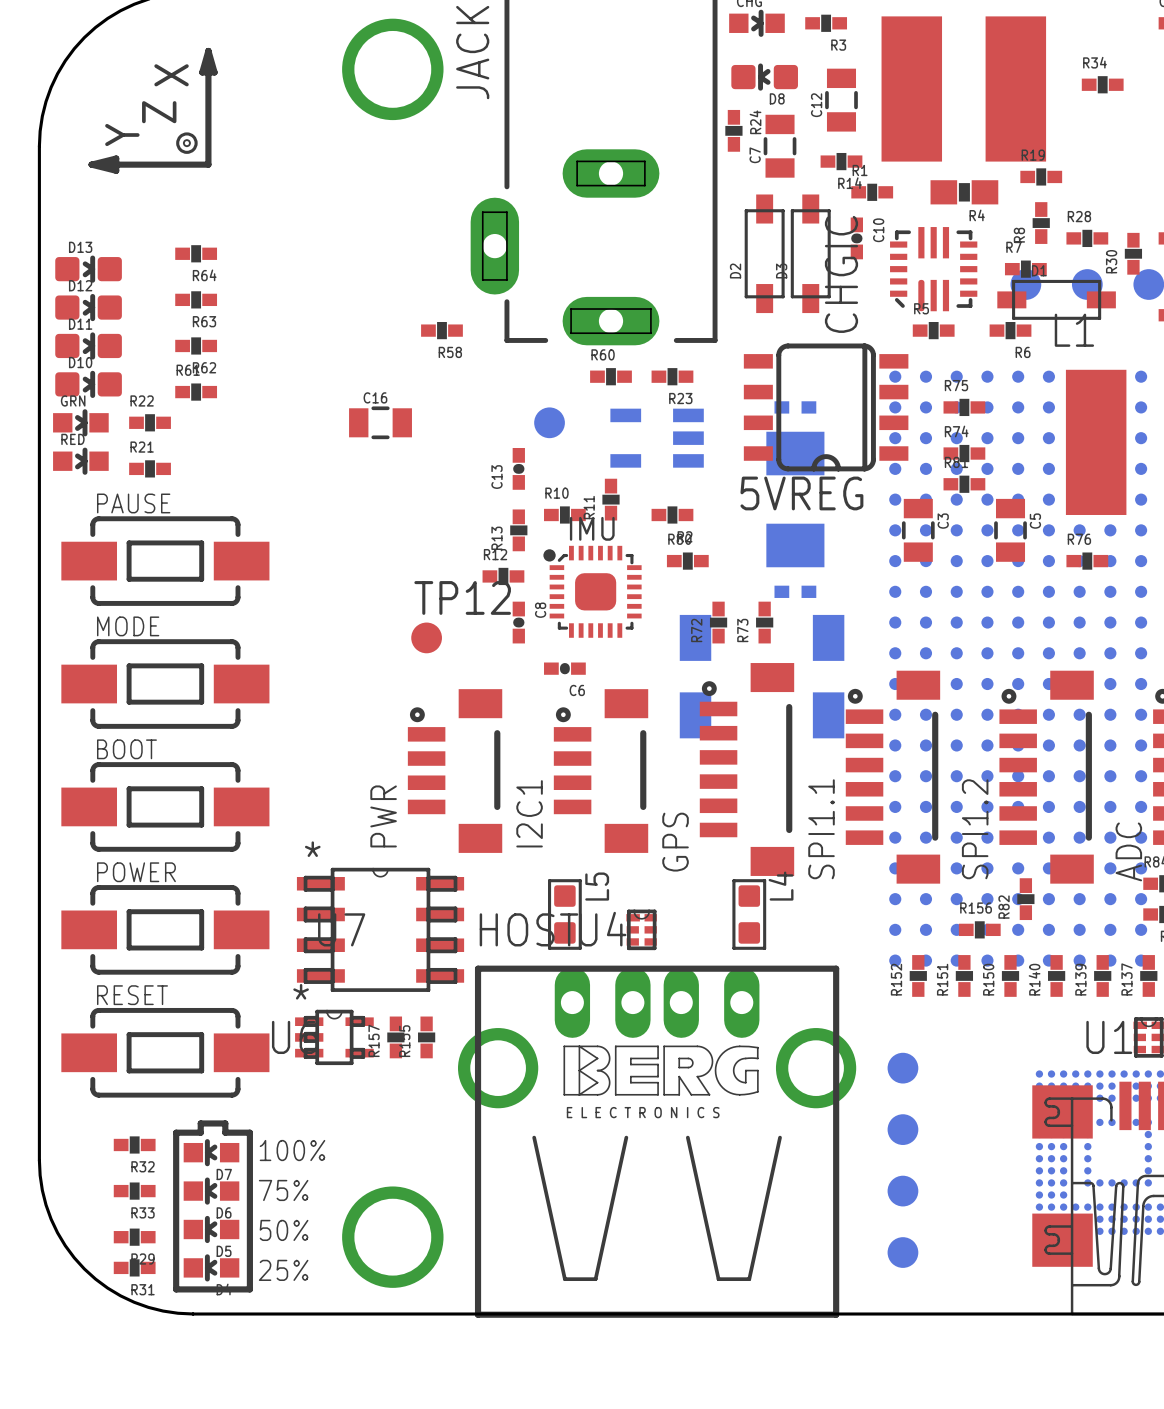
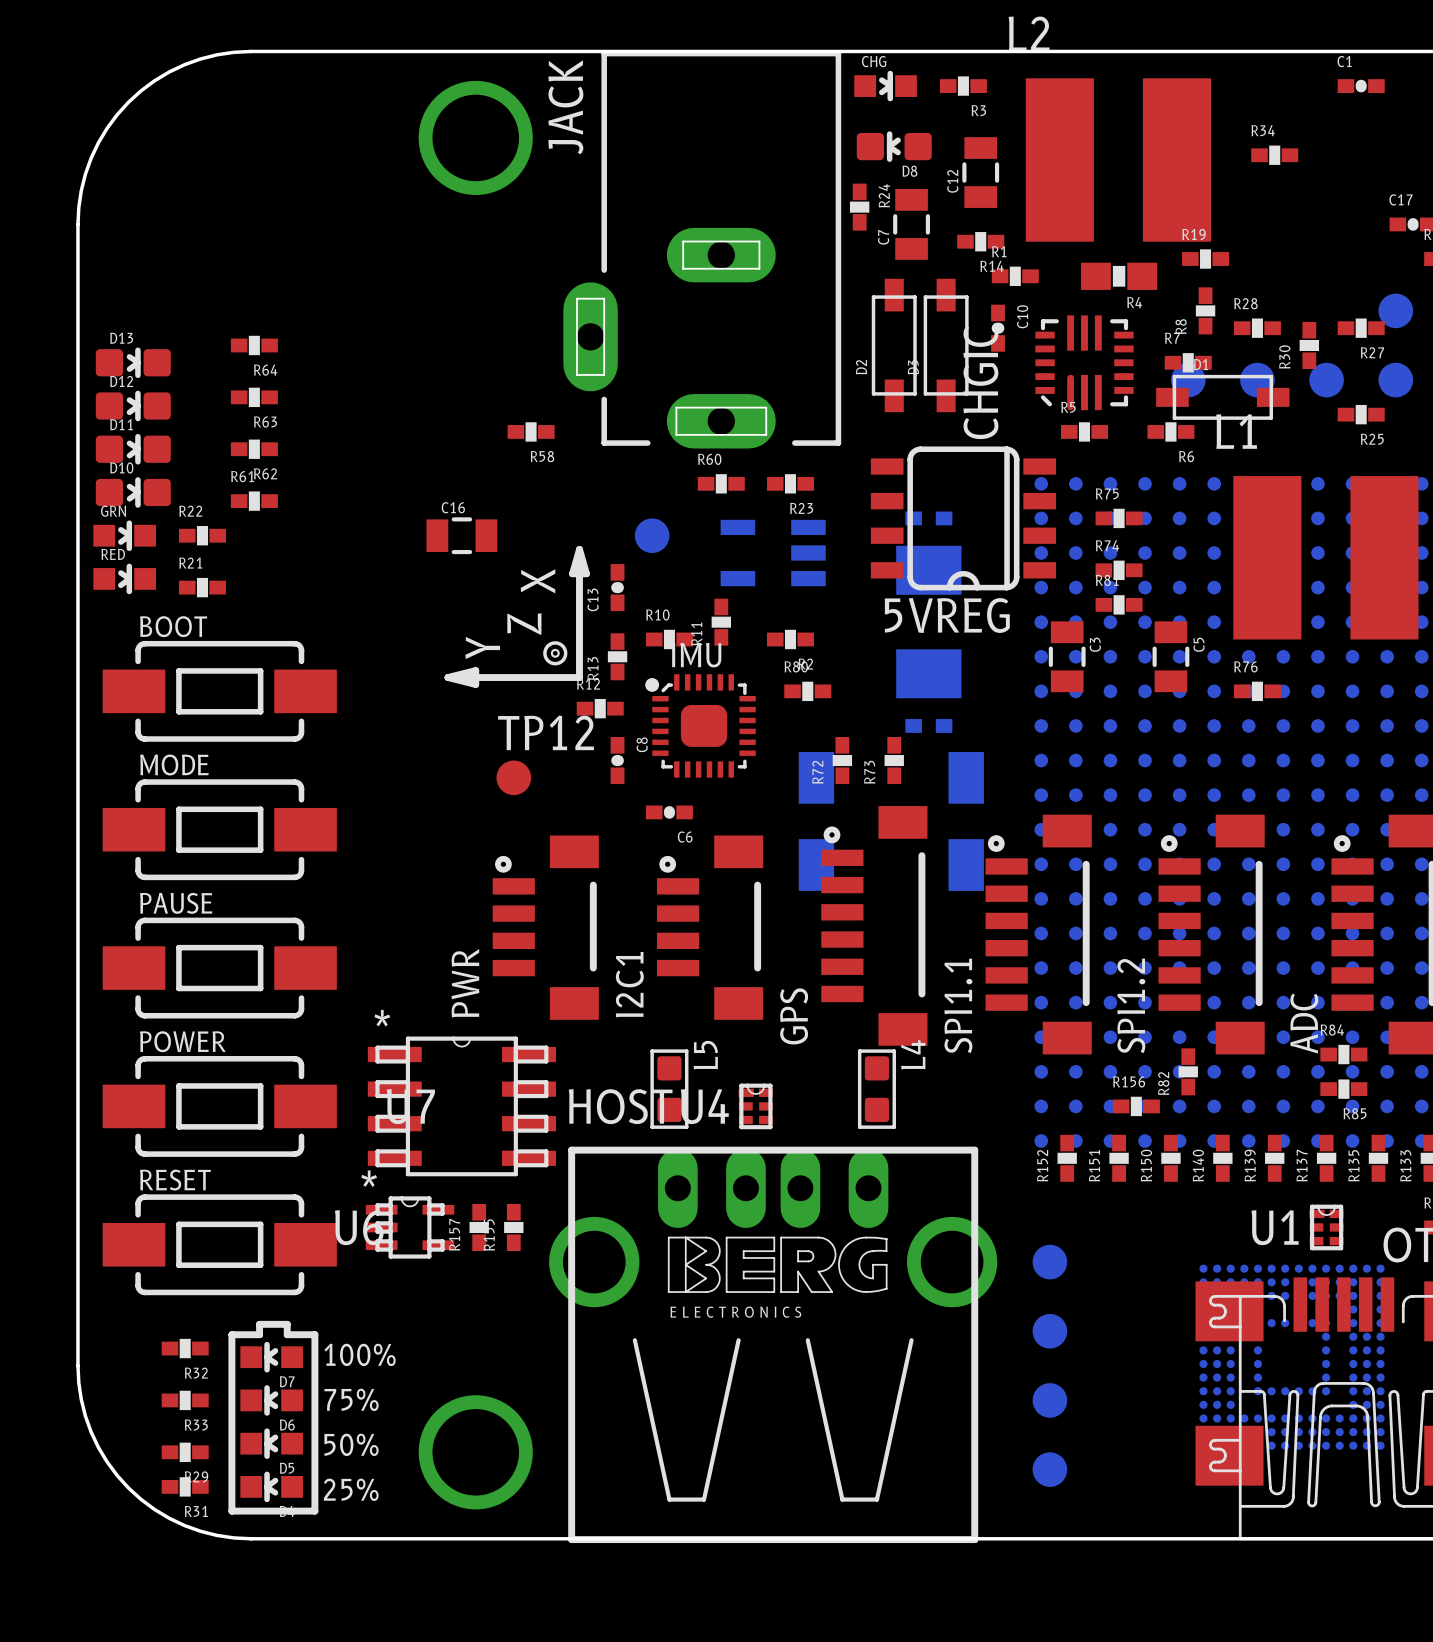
drawing position: (153, 110) -> (517, 617)
PAUSE name: PAUSE (133, 503) -> BOOT (173, 626)
BOOT name: BOOT (126, 749) -> PAUSE (176, 903)

